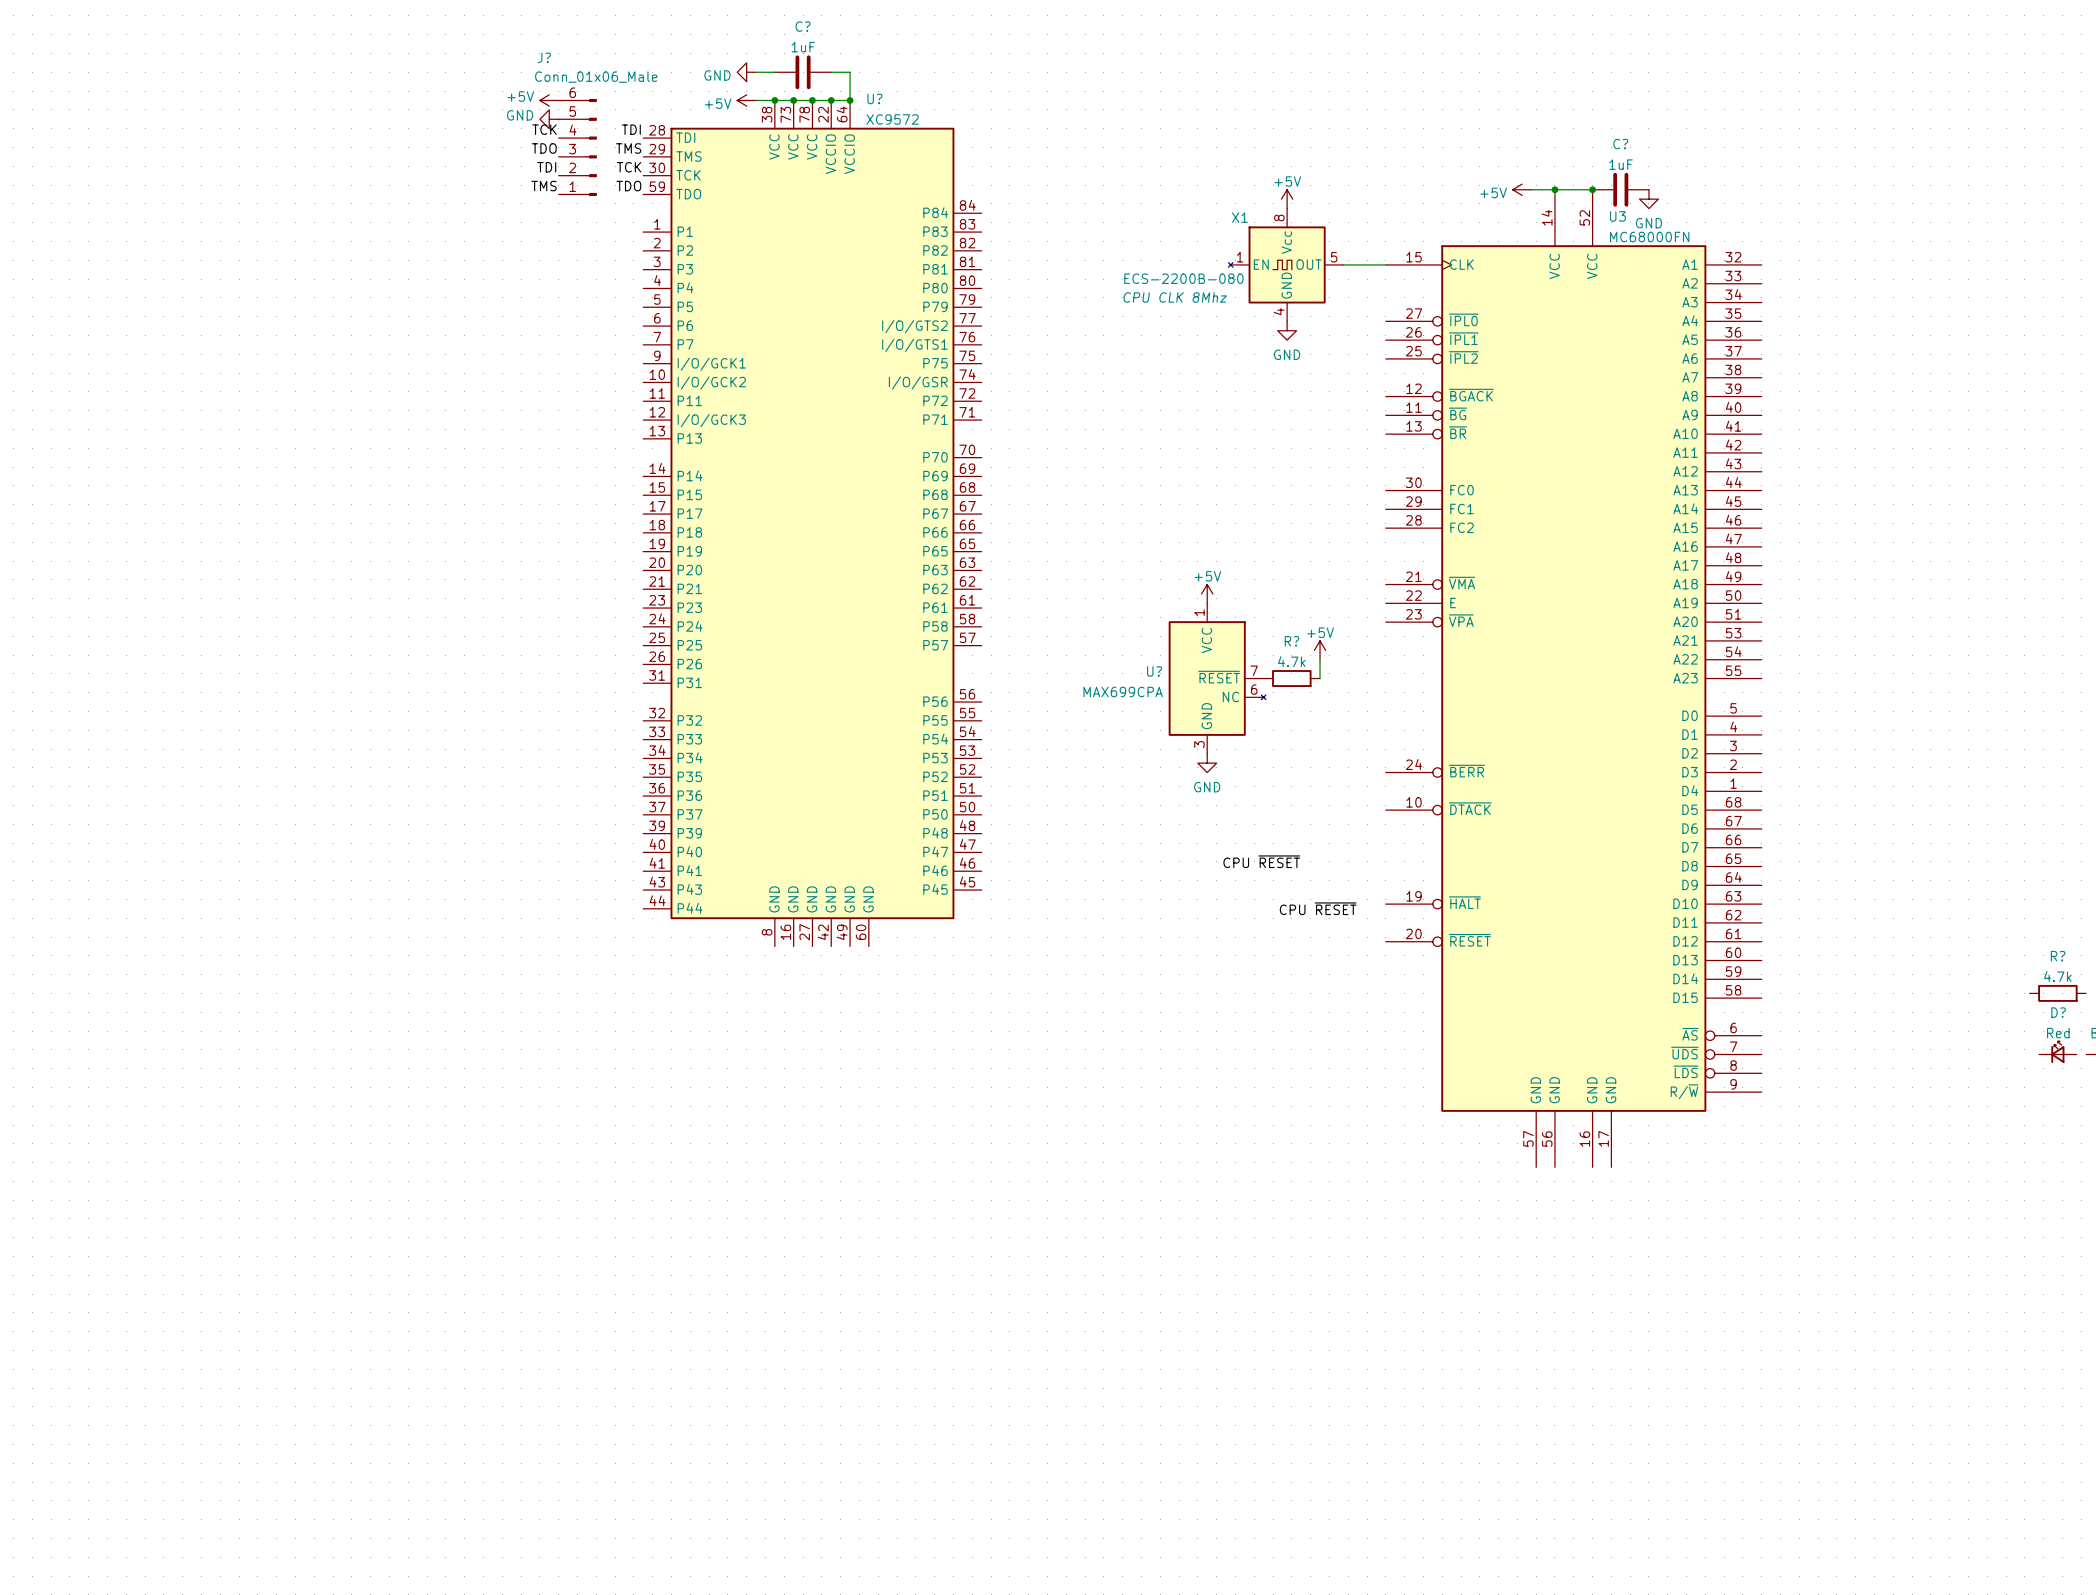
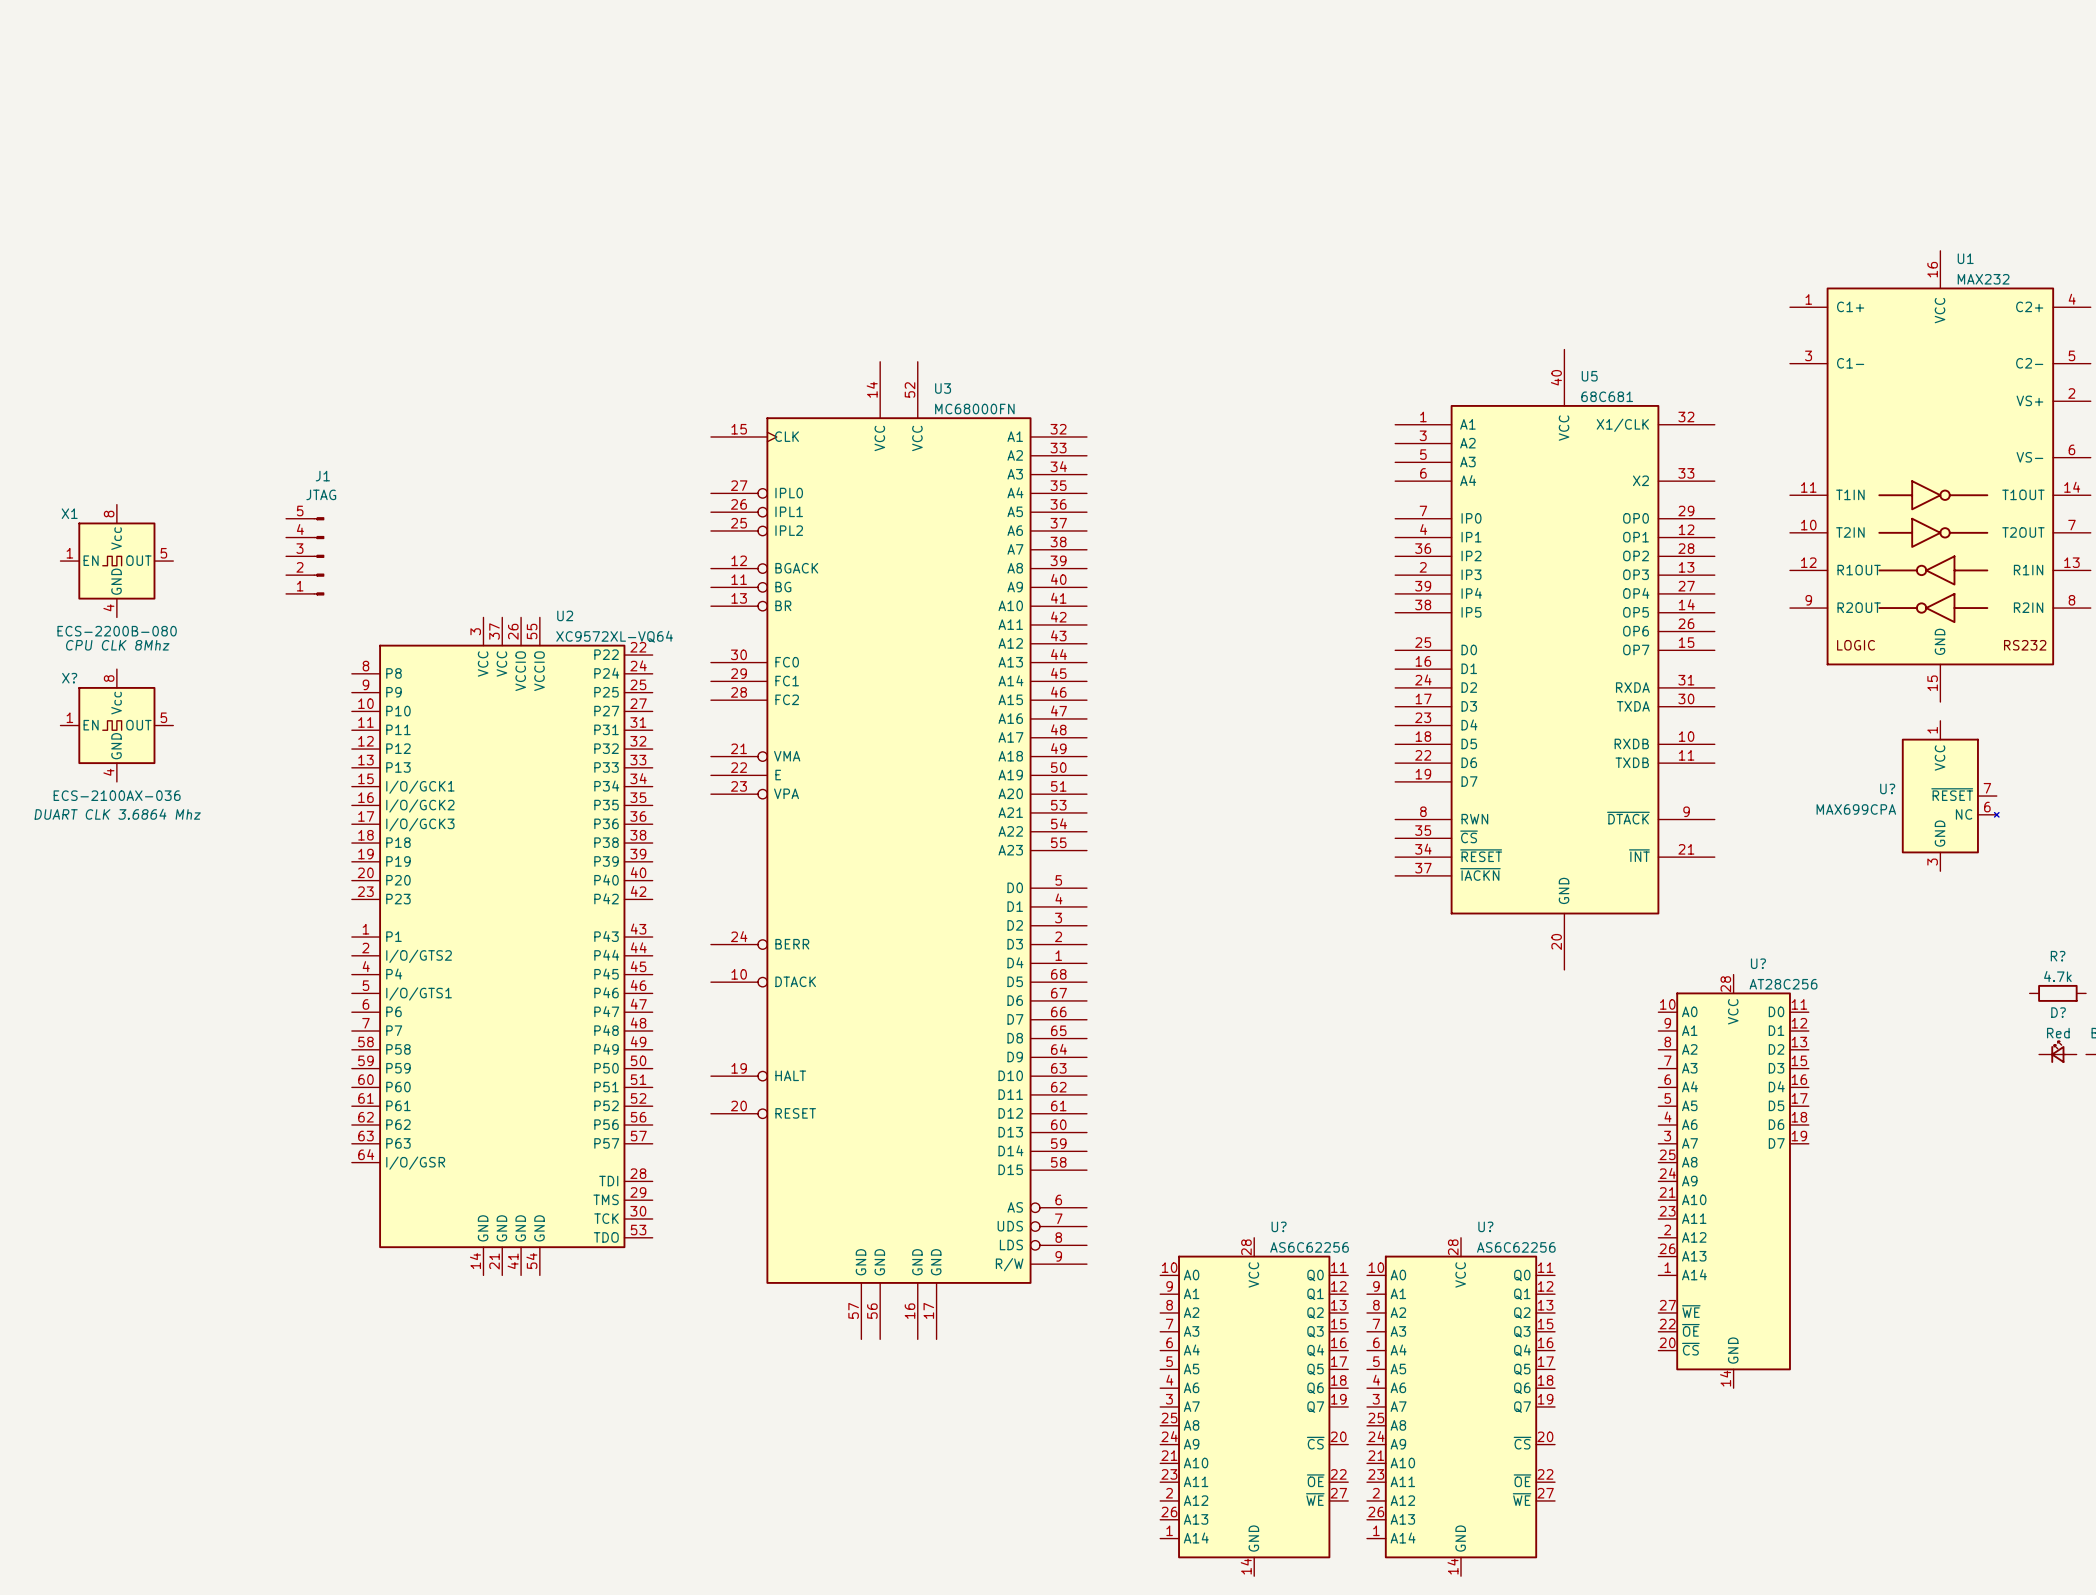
power symbol: GND (746, 72) -> none
wire: (756, 72) (774, 72) -> none
C?: 1uF (803, 72) -> none
wire: (831, 72) (850, 72) (850, 100) (756, 100) -> none
power symbol: +5V (549, 100) -> none
power symbol: +5V (746, 100) -> none
junction: (774, 100) -> none
junction: (793, 100) -> none
junction: (812, 100) -> none
junction: (831, 100) -> none
junction: (850, 100) -> none
power symbol: GND (549, 119) -> none
label: TCK (544, 129) -> none
label: TDI (631, 129) -> none
J?: Conn_01x06_Male (577, 147) -> none
label: TDO (544, 148) -> none
label: TMS (628, 148) -> none
label: TDI (546, 167) -> none
label: TCK (629, 167) -> none
label: TMS (544, 186) -> none
label: TDO (628, 186) -> none
U3 symbol: [1385, 189, 1762, 1168] -> [710, 361, 1087, 1340]
power symbol: +5V (1522, 189) -> none
wire: (1531, 189) (1592, 189) -> none
junction: (1554, 189) -> none
junction: (1592, 189) -> none
C?: 1uF (1620, 189) -> none
power symbol: +5V (1287, 199) -> none
power symbol: GND (1648, 199) -> none
X1 symbol: [1228, 208, 1344, 322] -> [60, 504, 174, 618]
wire: (1343, 264) (1385, 264) -> none
X1 value position: ECS-2200B-080 (1183, 278) -> ECS-2200B-080 (117, 631)
X1 text position: CPU CLK 8Mhz (1175, 297) -> CPU CLK 8Mhz (117, 645)
power symbol: GND (1287, 330) -> none
U1: none -> MAX232 (1940, 476)
U?: XC9572 (812, 523) -> none
J1: none -> JTAG (305, 556)
power symbol: +5V (1207, 593) -> none
power symbol: +5V (1320, 650) -> none
wire: (1320, 659) (1320, 678) -> none
U5: none -> 68C681 (1554, 659)
U?: MAX699CPA (1217, 678) -> none
R?: 4.7k (1291, 678) -> none
X?: none -> ECS-2100AX-036 (116, 725)
power symbol: GND (1207, 763) -> none
U?: none -> MAX699CPA (1950, 796)
label: CPU ~{RESET} (1261, 861) -> none
label: CPU ~{RESET} (1318, 908) -> none
U2: none -> XC9572XL-VQ64 (502, 946)
U?: none -> AT28C256 (1733, 1181)
U?: none -> AS6C62256 (1254, 1406)
U?: none -> AS6C62256 (1461, 1406)

